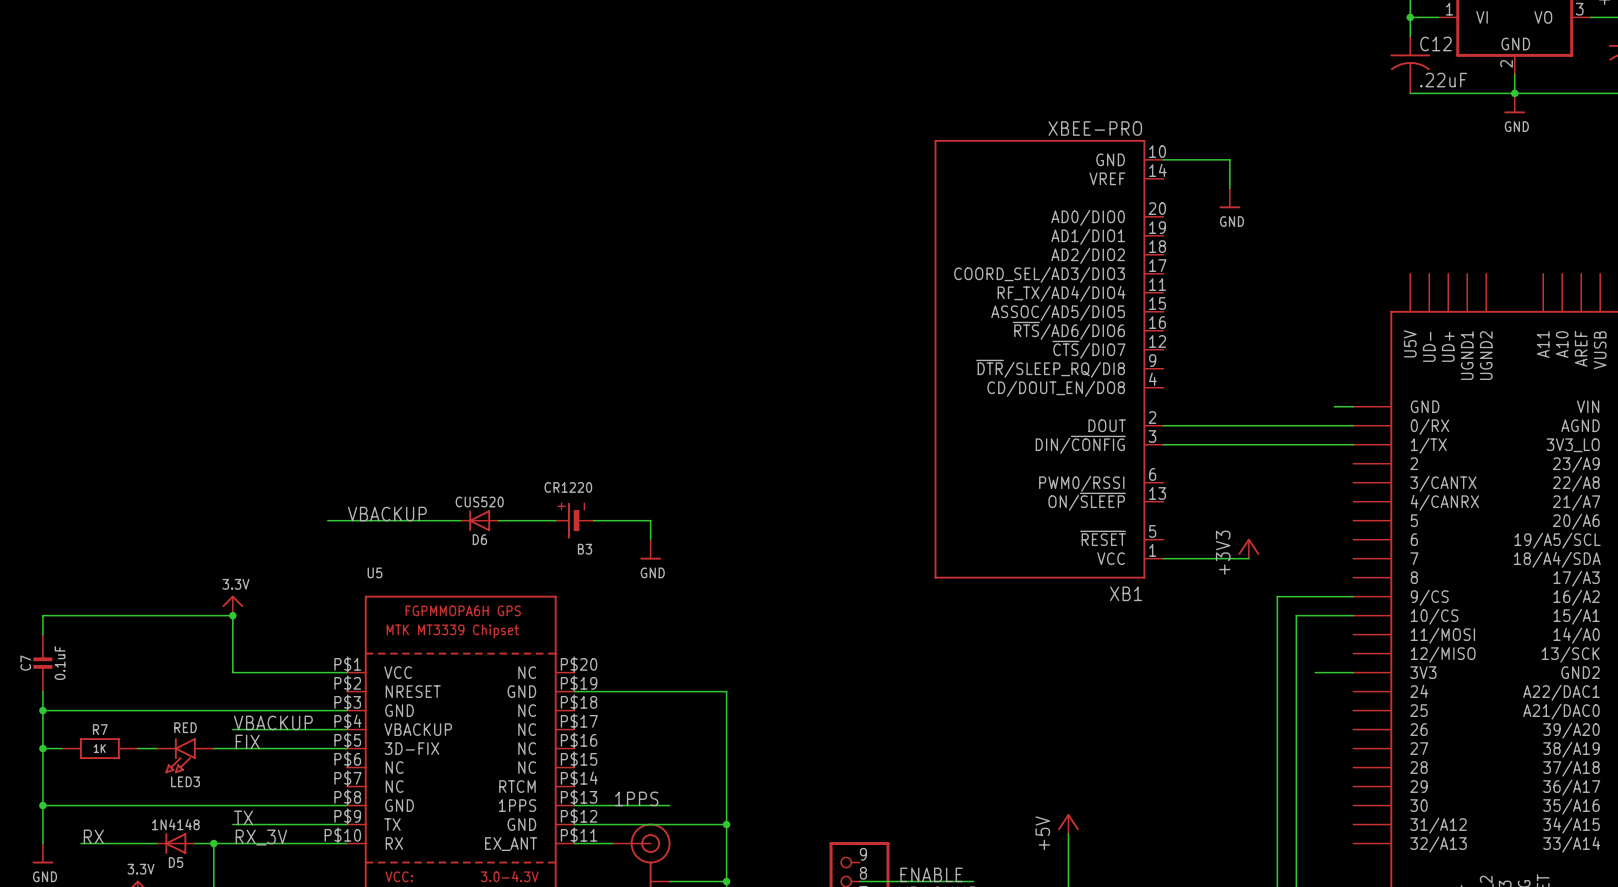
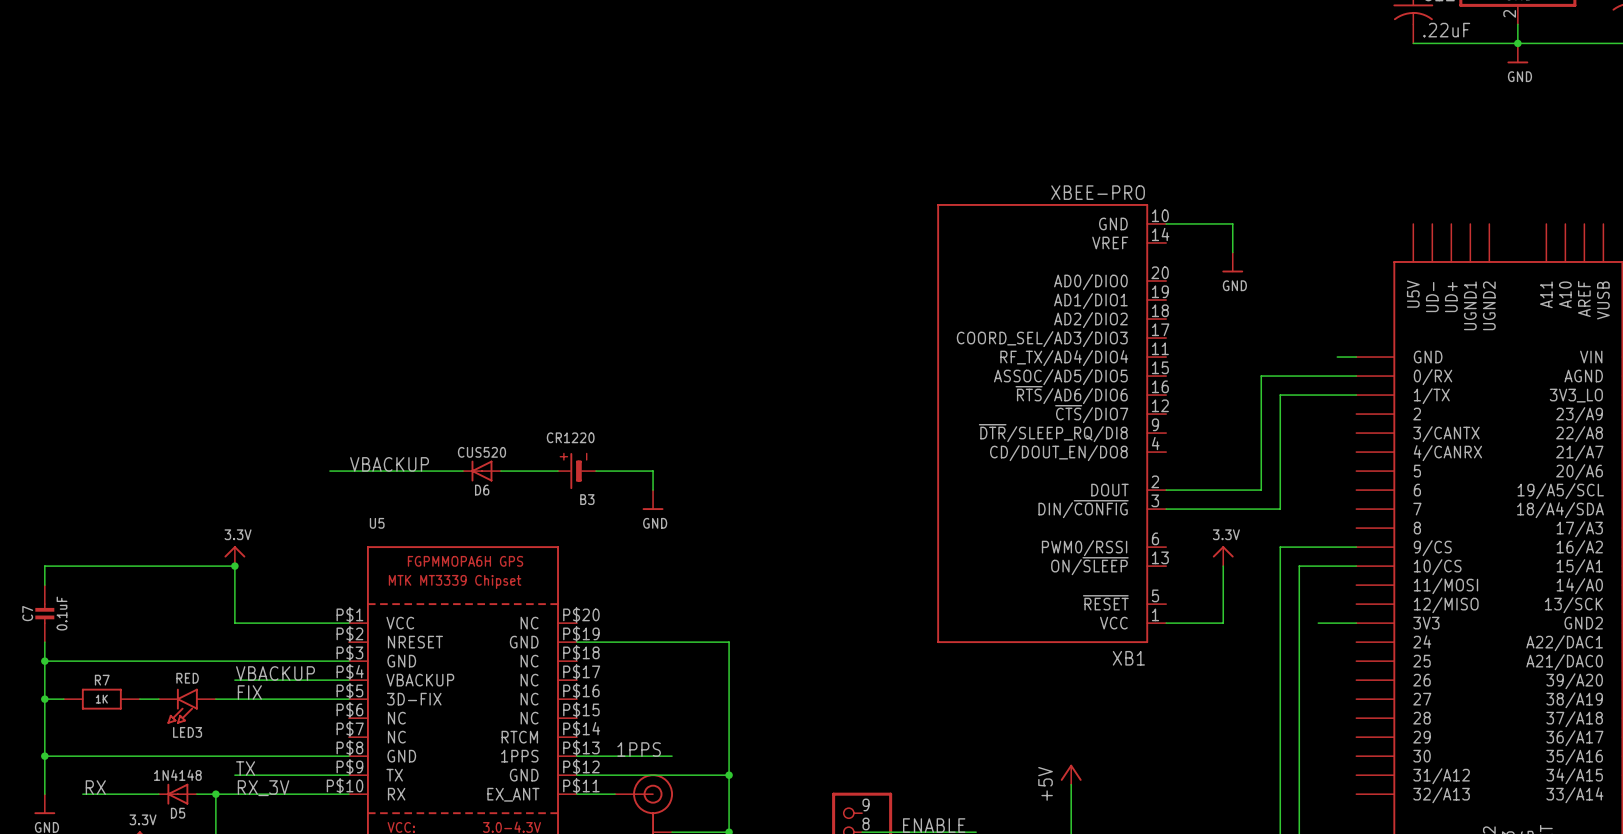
wire: (1163, 159) (1229, 159) (1229, 188) -> (1166, 223) (1232, 223) (1232, 252)
power symbol position: GND (1229, 198) -> GND (1232, 262)
XB1 position: (1048, 359) -> (1051, 423)
wire: (1163, 425) (1258, 425) -> (1166, 490) (1261, 490) (1261, 376)
wire: (1163, 444) (1277, 444) -> (1251, 509) (1280, 509) (1280, 395)
power symbol: +3V3 (1248, 548) -> none
power symbol: none -> 3.3V (1223, 556)
wire: none -> (1223, 566) (1223, 623) (1166, 623)

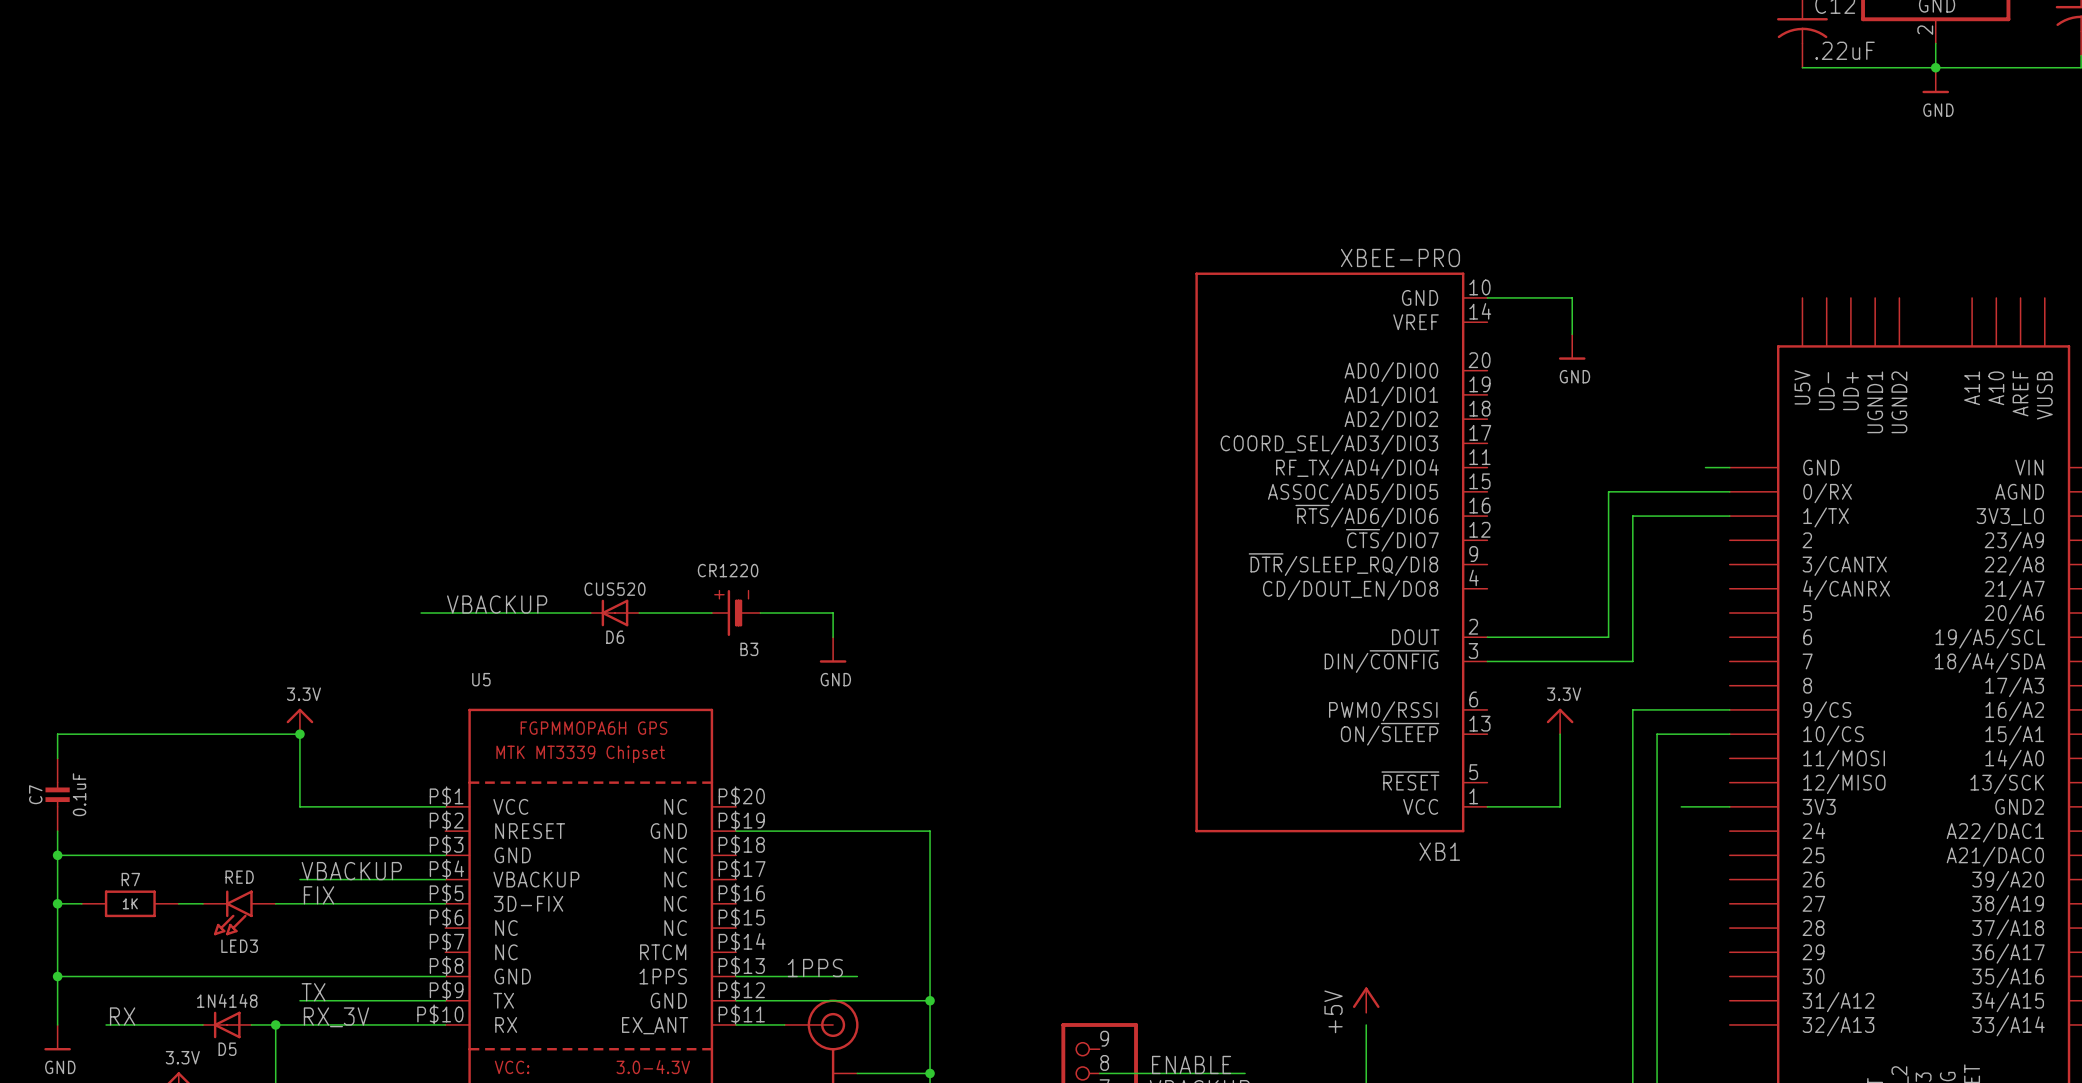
wire: (1071, 784) (1071, 794) -> none

